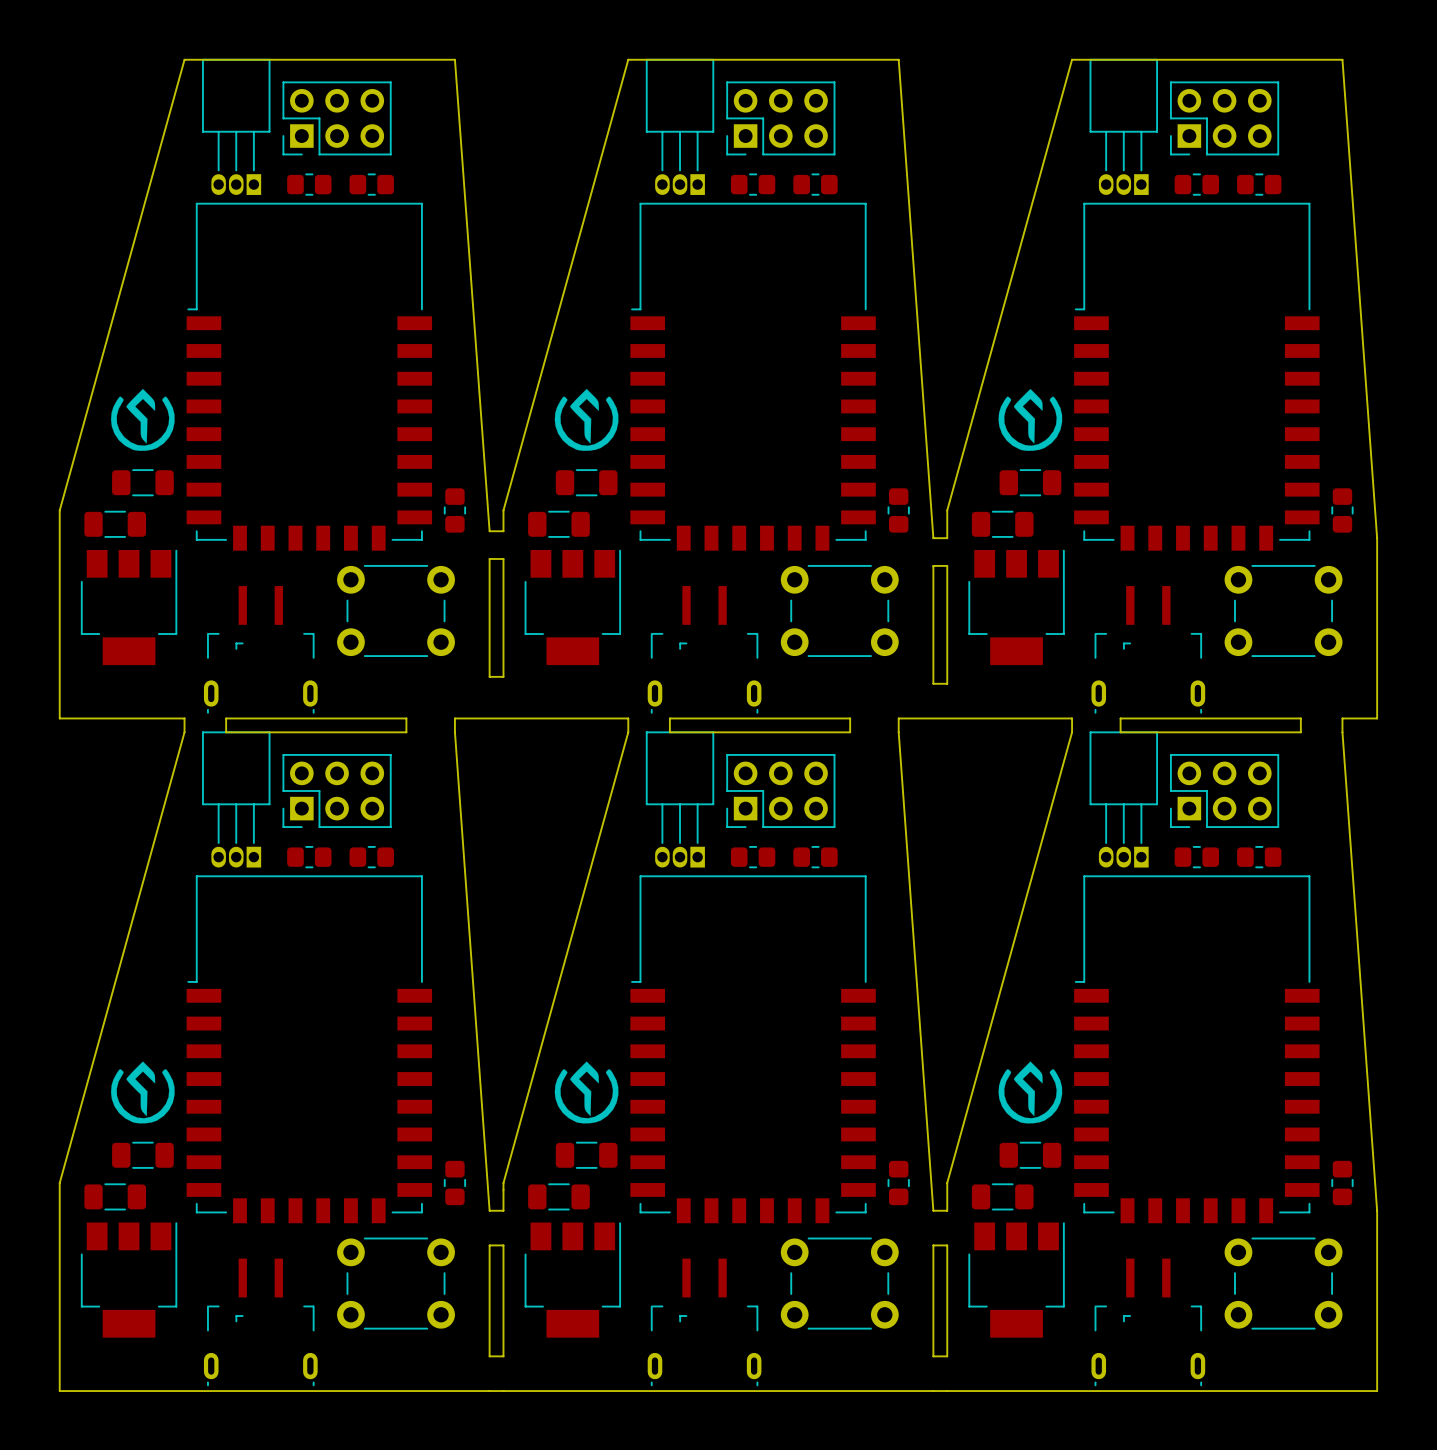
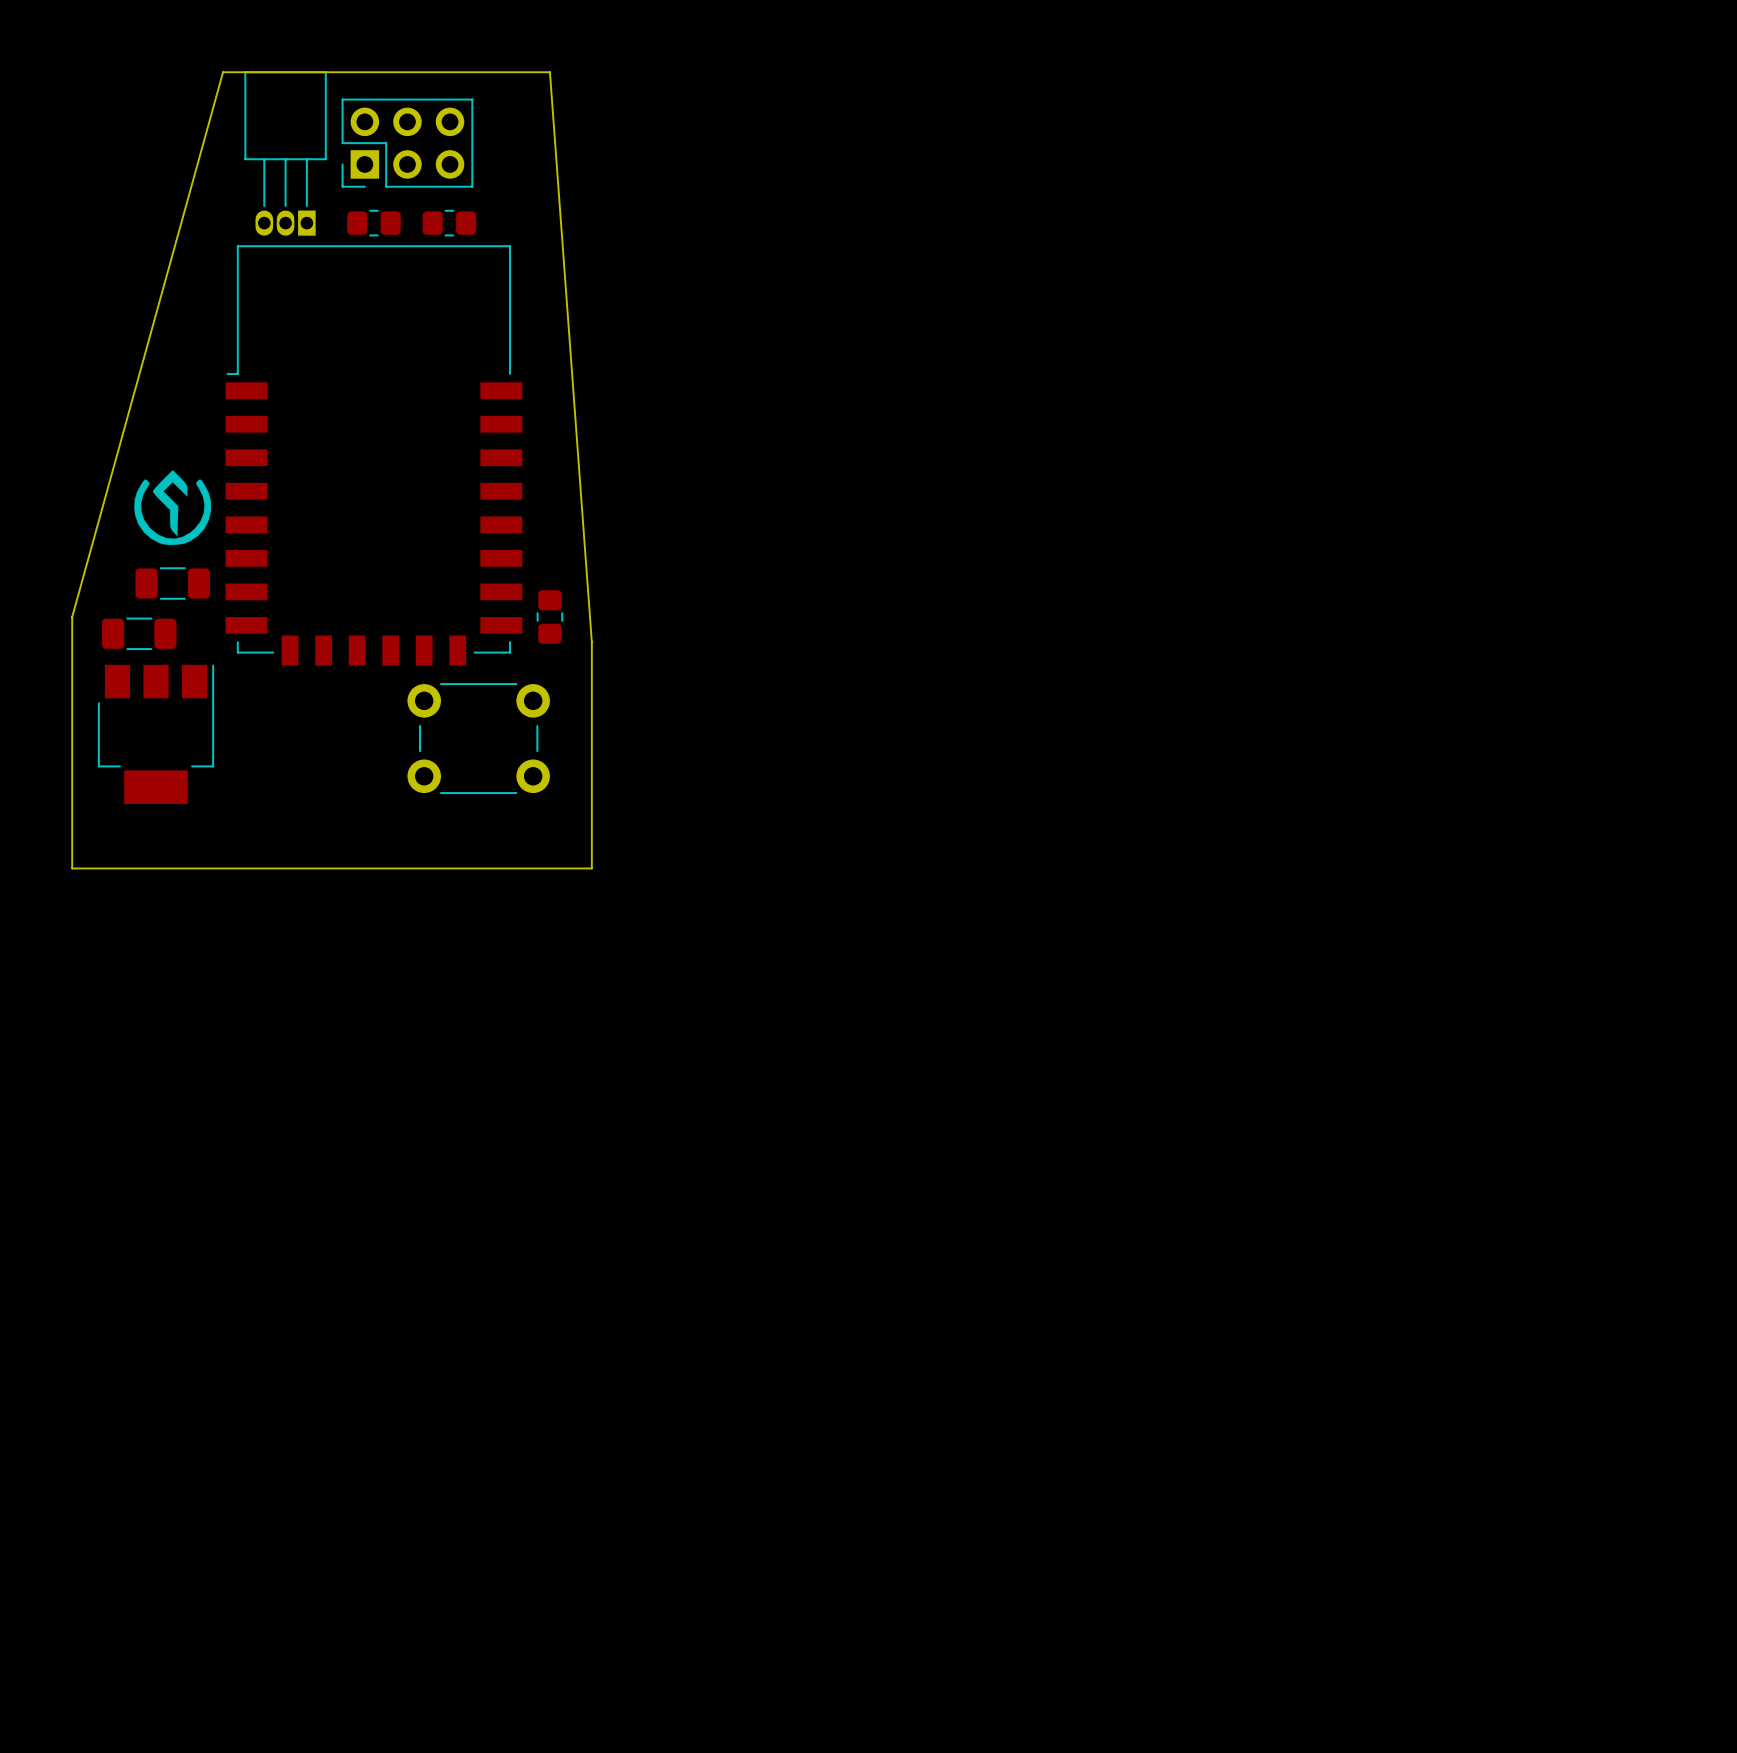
part: (780, 118) -> none
part: (1224, 118) -> none
part: (680, 126) -> none
part: (1123, 126) -> none
part: (753, 184) -> none
part: (815, 184) -> none
part: (1196, 184) -> none
part: (1259, 184) -> none
part: (753, 376) -> none
part: (1196, 376) -> none
drawing: [554, 388, 619, 451] -> none
drawing: [998, 388, 1063, 451] -> none
part: (586, 482) -> none
part: (1030, 482) -> none
part: (898, 510) -> none
part: (1342, 510) -> none
part: (558, 524) -> none
part: (1002, 524) -> none
board edge: (489, 531) (503, 531) (503, 510) (628, 59) (898, 59) (933, 538) (947, 538) (947, 510) (1072, 59) (1342, 59) (1377, 538) (1377, 718) (1342, 718) (1377, 1210) (1377, 1391) (59, 1391) (59, 1183) (184, 732) (184, 718) -> none
board edge: (489, 558) (503, 558) (503, 676) (489, 676) -> (591, 675) (591, 642)
board edge: (933, 565) (933, 683) (947, 683) (947, 565) (933, 565) -> none
part: (572, 607) -> none
part: (1016, 607) -> none
part: (839, 610) -> none
part: (1283, 610) -> none
part: (260, 649) -> none
part: (704, 649) -> none
part: (1148, 649) -> none
board edge: (226, 718) (226, 732) (406, 732) (406, 718) -> (273, 868) (223, 868)
board edge: none -> (491, 868) (549, 868)
board edge: (454, 718) (489, 1210) (503, 1210) (503, 1183) (628, 732) (628, 718) (489, 718) -> (591, 818) (591, 868)
board edge: (669, 718) (850, 718) (850, 732) (669, 732) (669, 718) -> none
board edge: (898, 718) (1072, 718) (1072, 732) (947, 1183) (947, 1210) (933, 1210) (898, 718) -> none
board edge: (1120, 718) (1300, 718) (1300, 732) (1120, 732) (1120, 718) -> none
part: (337, 790) -> none
part: (780, 790) -> none
part: (1224, 790) -> none
part: (236, 799) -> none
part: (680, 799) -> none
part: (1123, 799) -> none
part: (309, 857) -> none
part: (371, 857) -> none
part: (753, 857) -> none
part: (815, 857) -> none
part: (1196, 857) -> none
part: (1259, 857) -> none
part: (309, 1049) -> none
part: (753, 1049) -> none
part: (1196, 1049) -> none
drawing: [110, 1061, 175, 1124] -> none
drawing: [554, 1061, 619, 1124] -> none
drawing: [998, 1061, 1063, 1124] -> none
part: (142, 1155) -> none
part: (586, 1155) -> none
part: (1030, 1155) -> none
part: (454, 1183) -> none
part: (898, 1183) -> none
part: (1342, 1183) -> none
part: (115, 1196) -> none
part: (558, 1196) -> none
part: (1002, 1196) -> none
board edge: (489, 1245) (489, 1356) (503, 1356) (503, 1245) (489, 1245) -> none
board edge: (933, 1245) (933, 1356) (947, 1356) (947, 1245) (933, 1245) -> none
part: (129, 1280) -> none
part: (572, 1280) -> none
part: (1016, 1280) -> none
part: (396, 1283) -> none
part: (839, 1283) -> none
part: (1283, 1283) -> none
part: (260, 1322) -> none
part: (704, 1322) -> none
part: (1148, 1322) -> none

